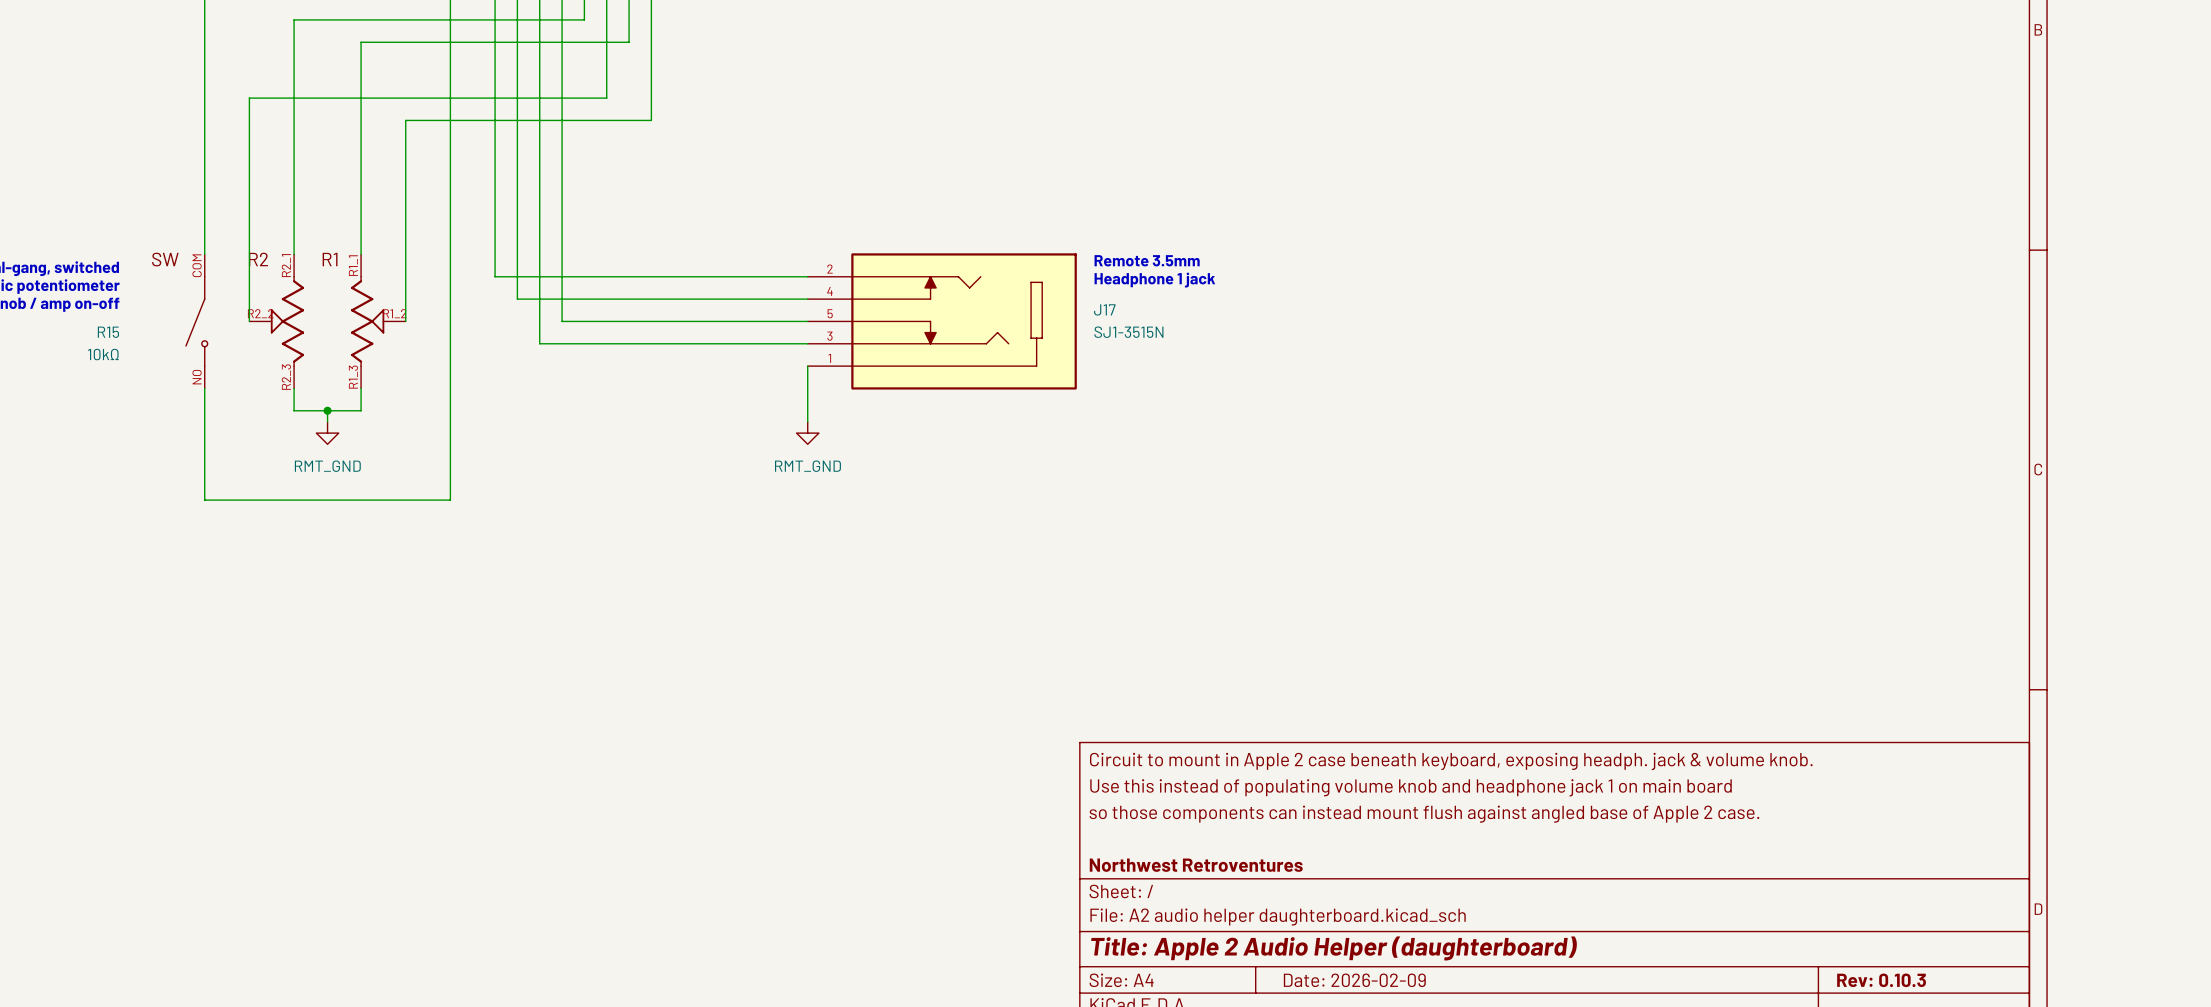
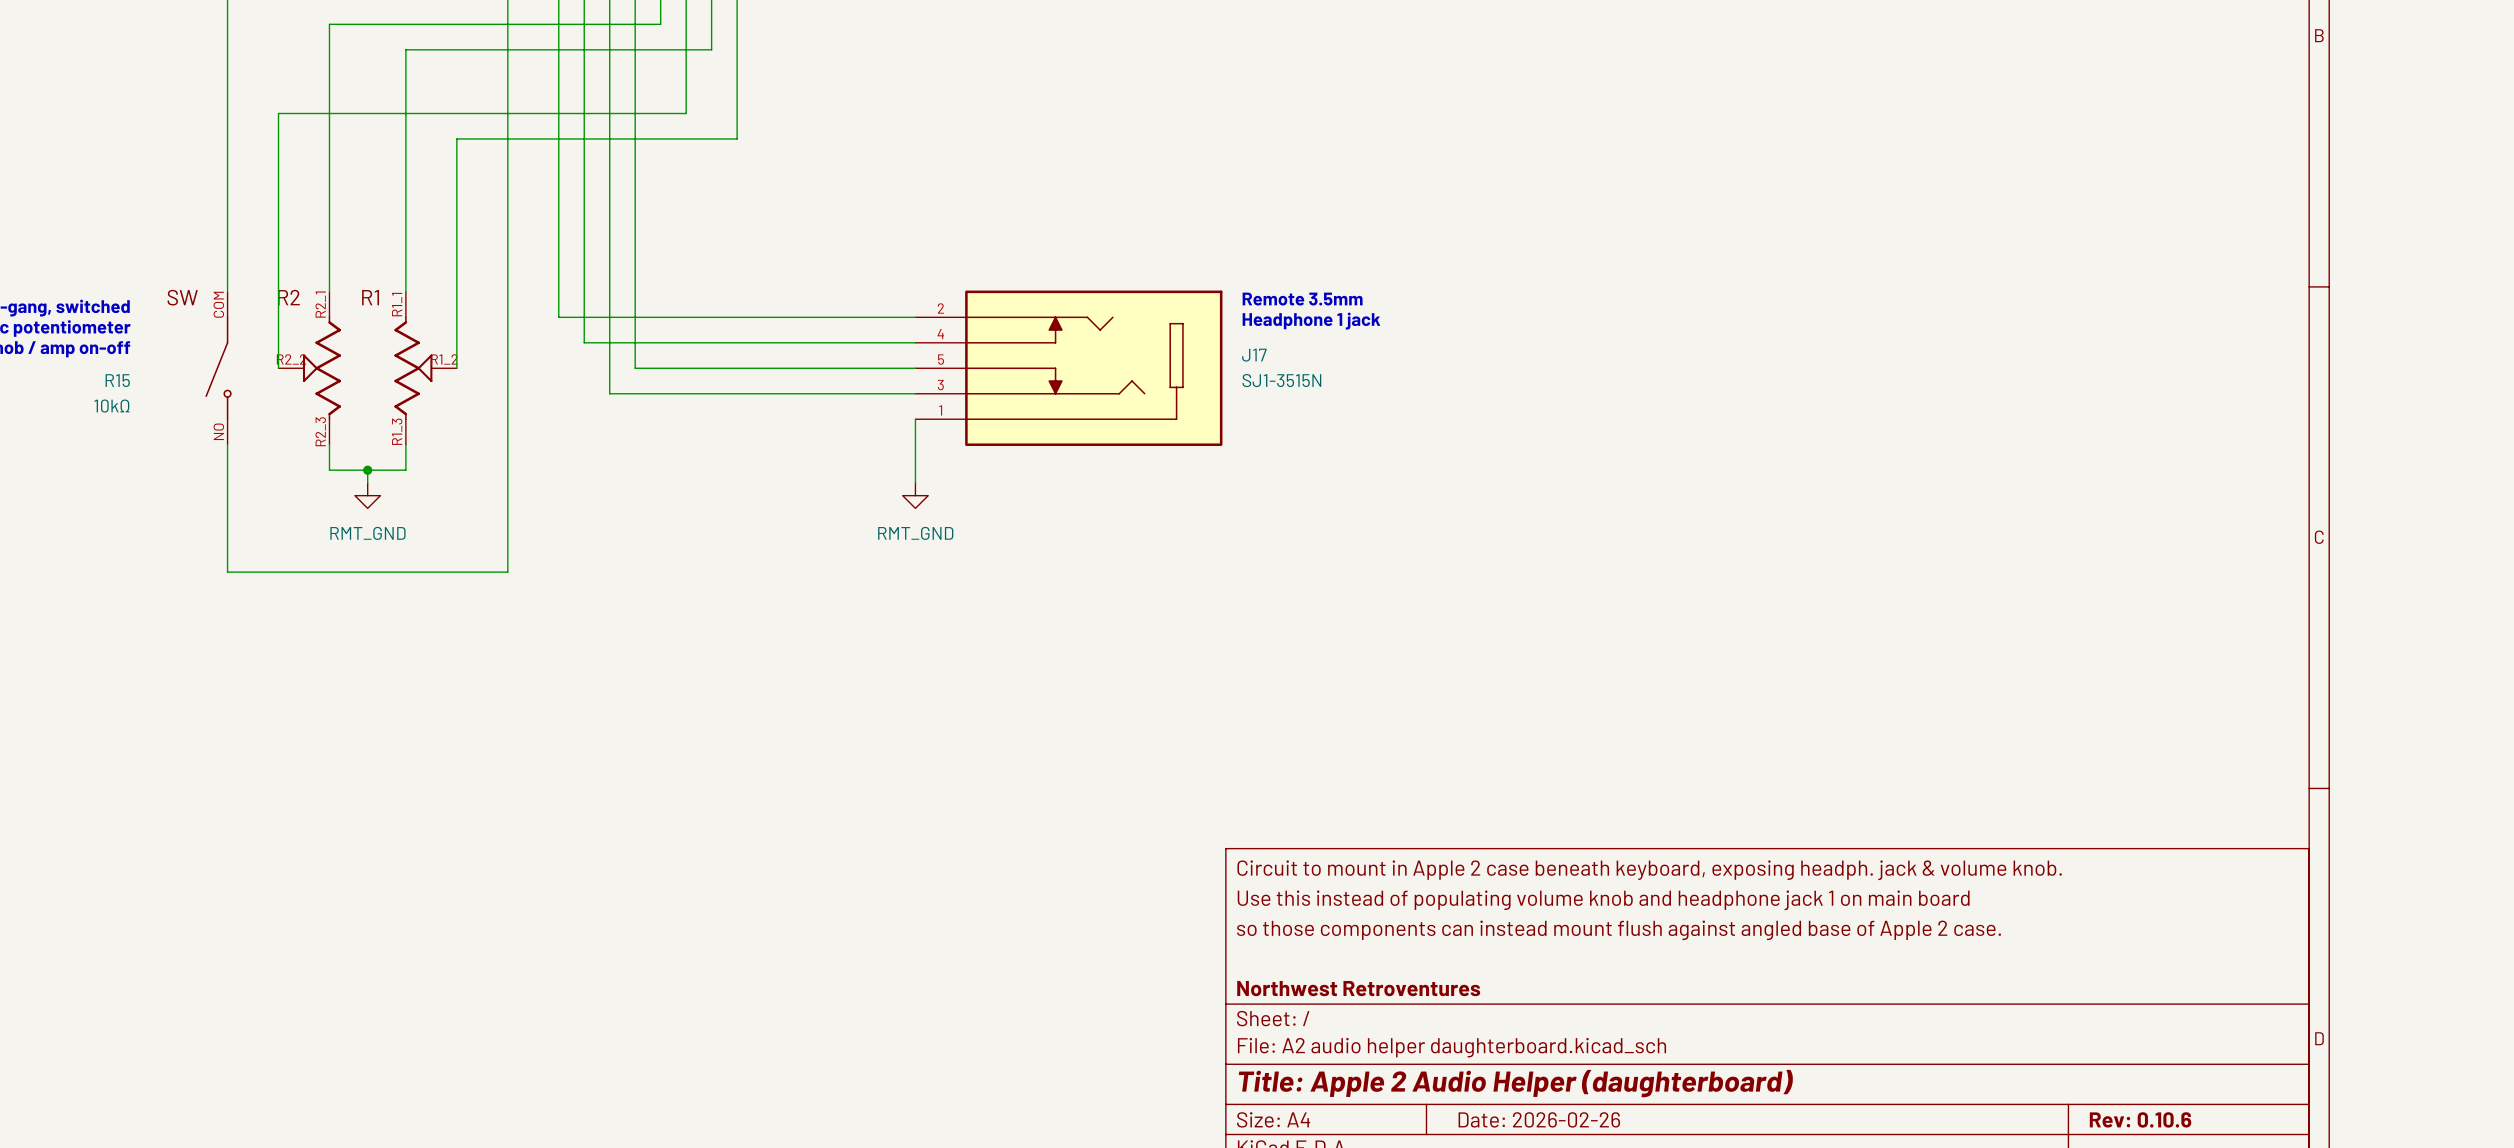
title block: Date: 2026-02-09 (1354, 980) -> Date: 2026-02-26 (1539, 1119)
title block: Rev: 0.10.3 (1881, 980) -> Rev: 0.10.6 (2140, 1119)

